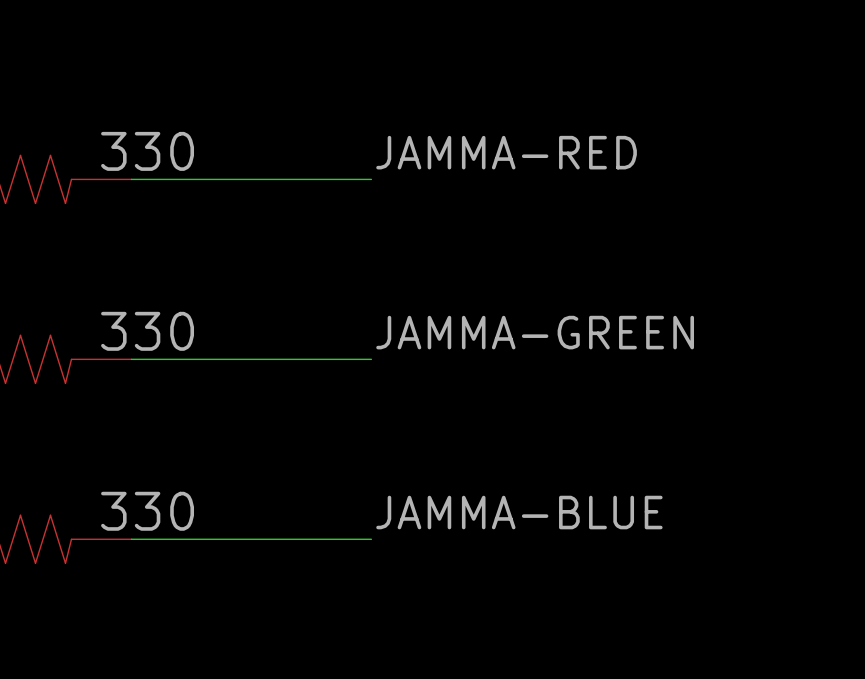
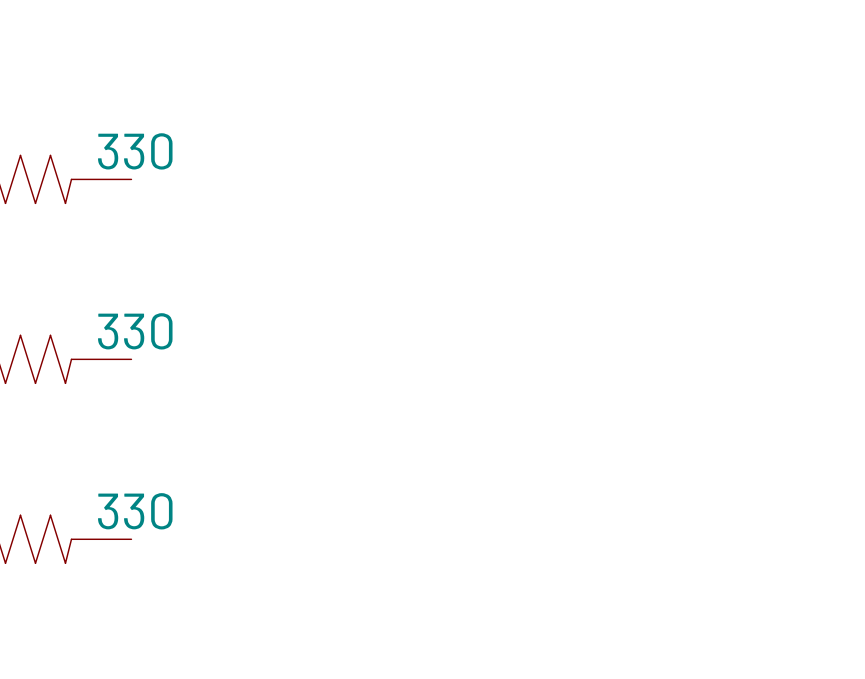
label: JAMMA-RED (506, 152) -> none
wire: (131, 179) (371, 179) -> none
label: JAMMA-GREEN (535, 332) -> none
wire: (131, 359) (371, 359) -> none
label: JAMMA-BLUE (519, 512) -> none
wire: (131, 539) (371, 539) -> none

